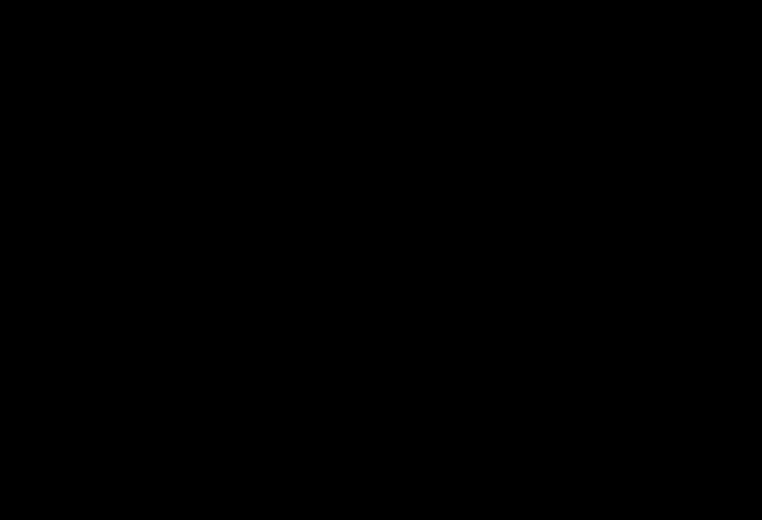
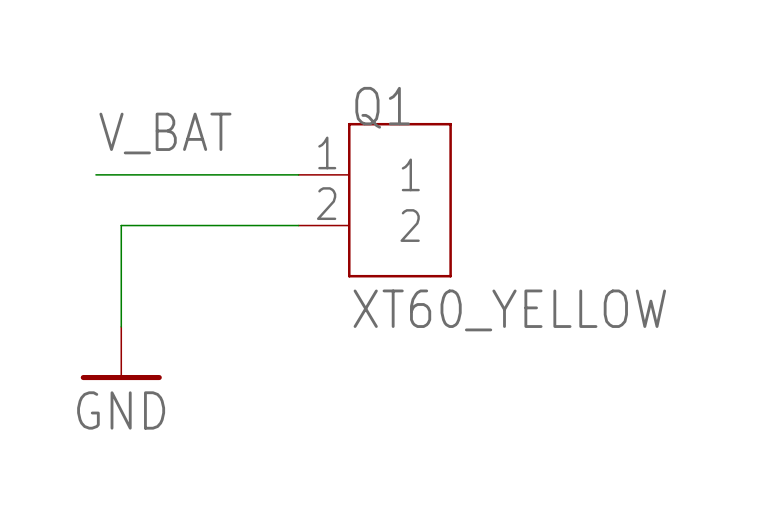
label: none -> V_BAT (165, 133)
wire: none -> (95, 174) (298, 174)
Q1: none -> XT60_YELLOW (375, 200)
wire: none -> (298, 225) (121, 225) (121, 326)
power symbol: none -> GND (121, 353)

